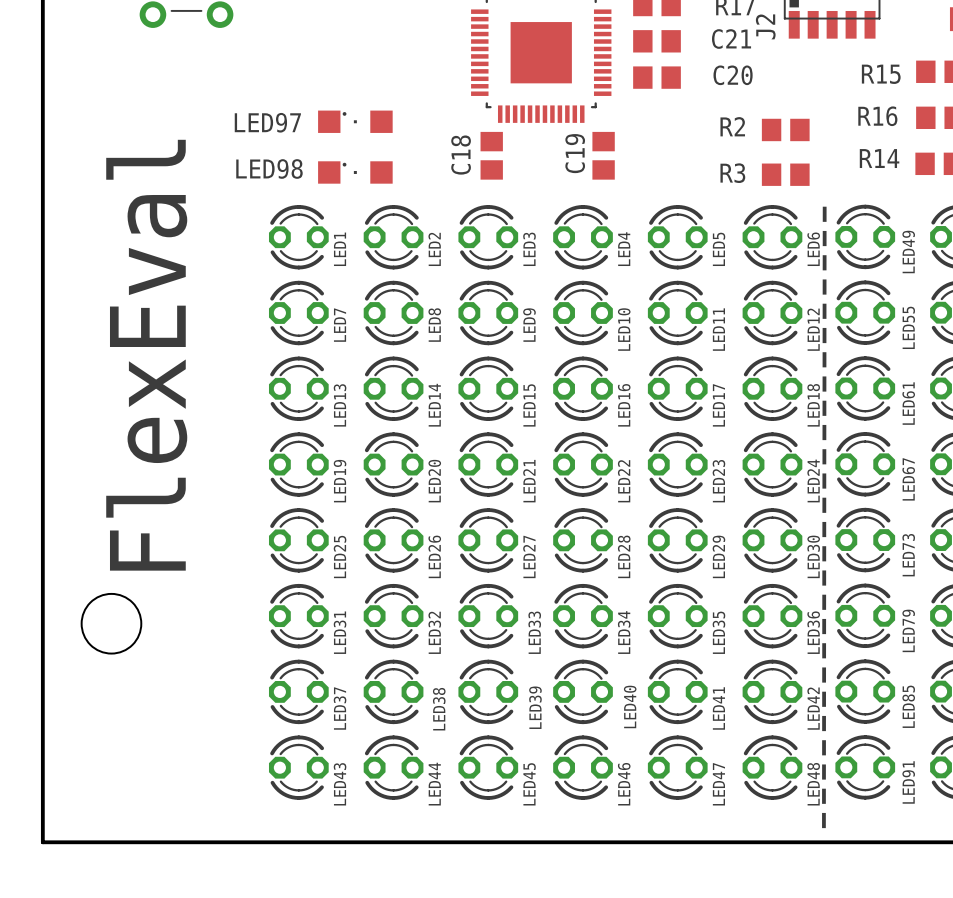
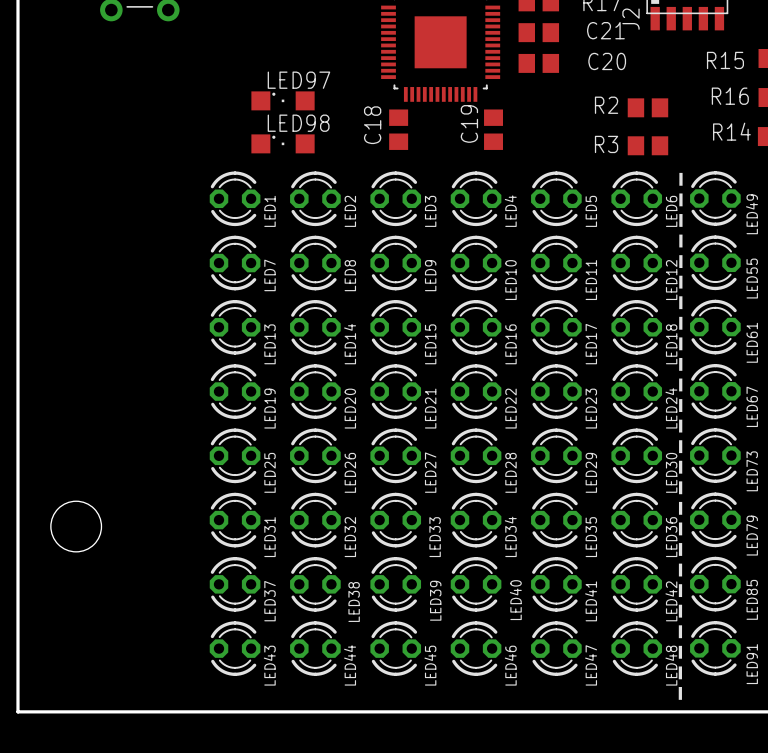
LED97 name position: LED97 (267, 122) -> LED97 (298, 80)
LED98 name position: LED98 (269, 168) -> LED98 (298, 123)
text: FlexEval (146, 355) -> none

